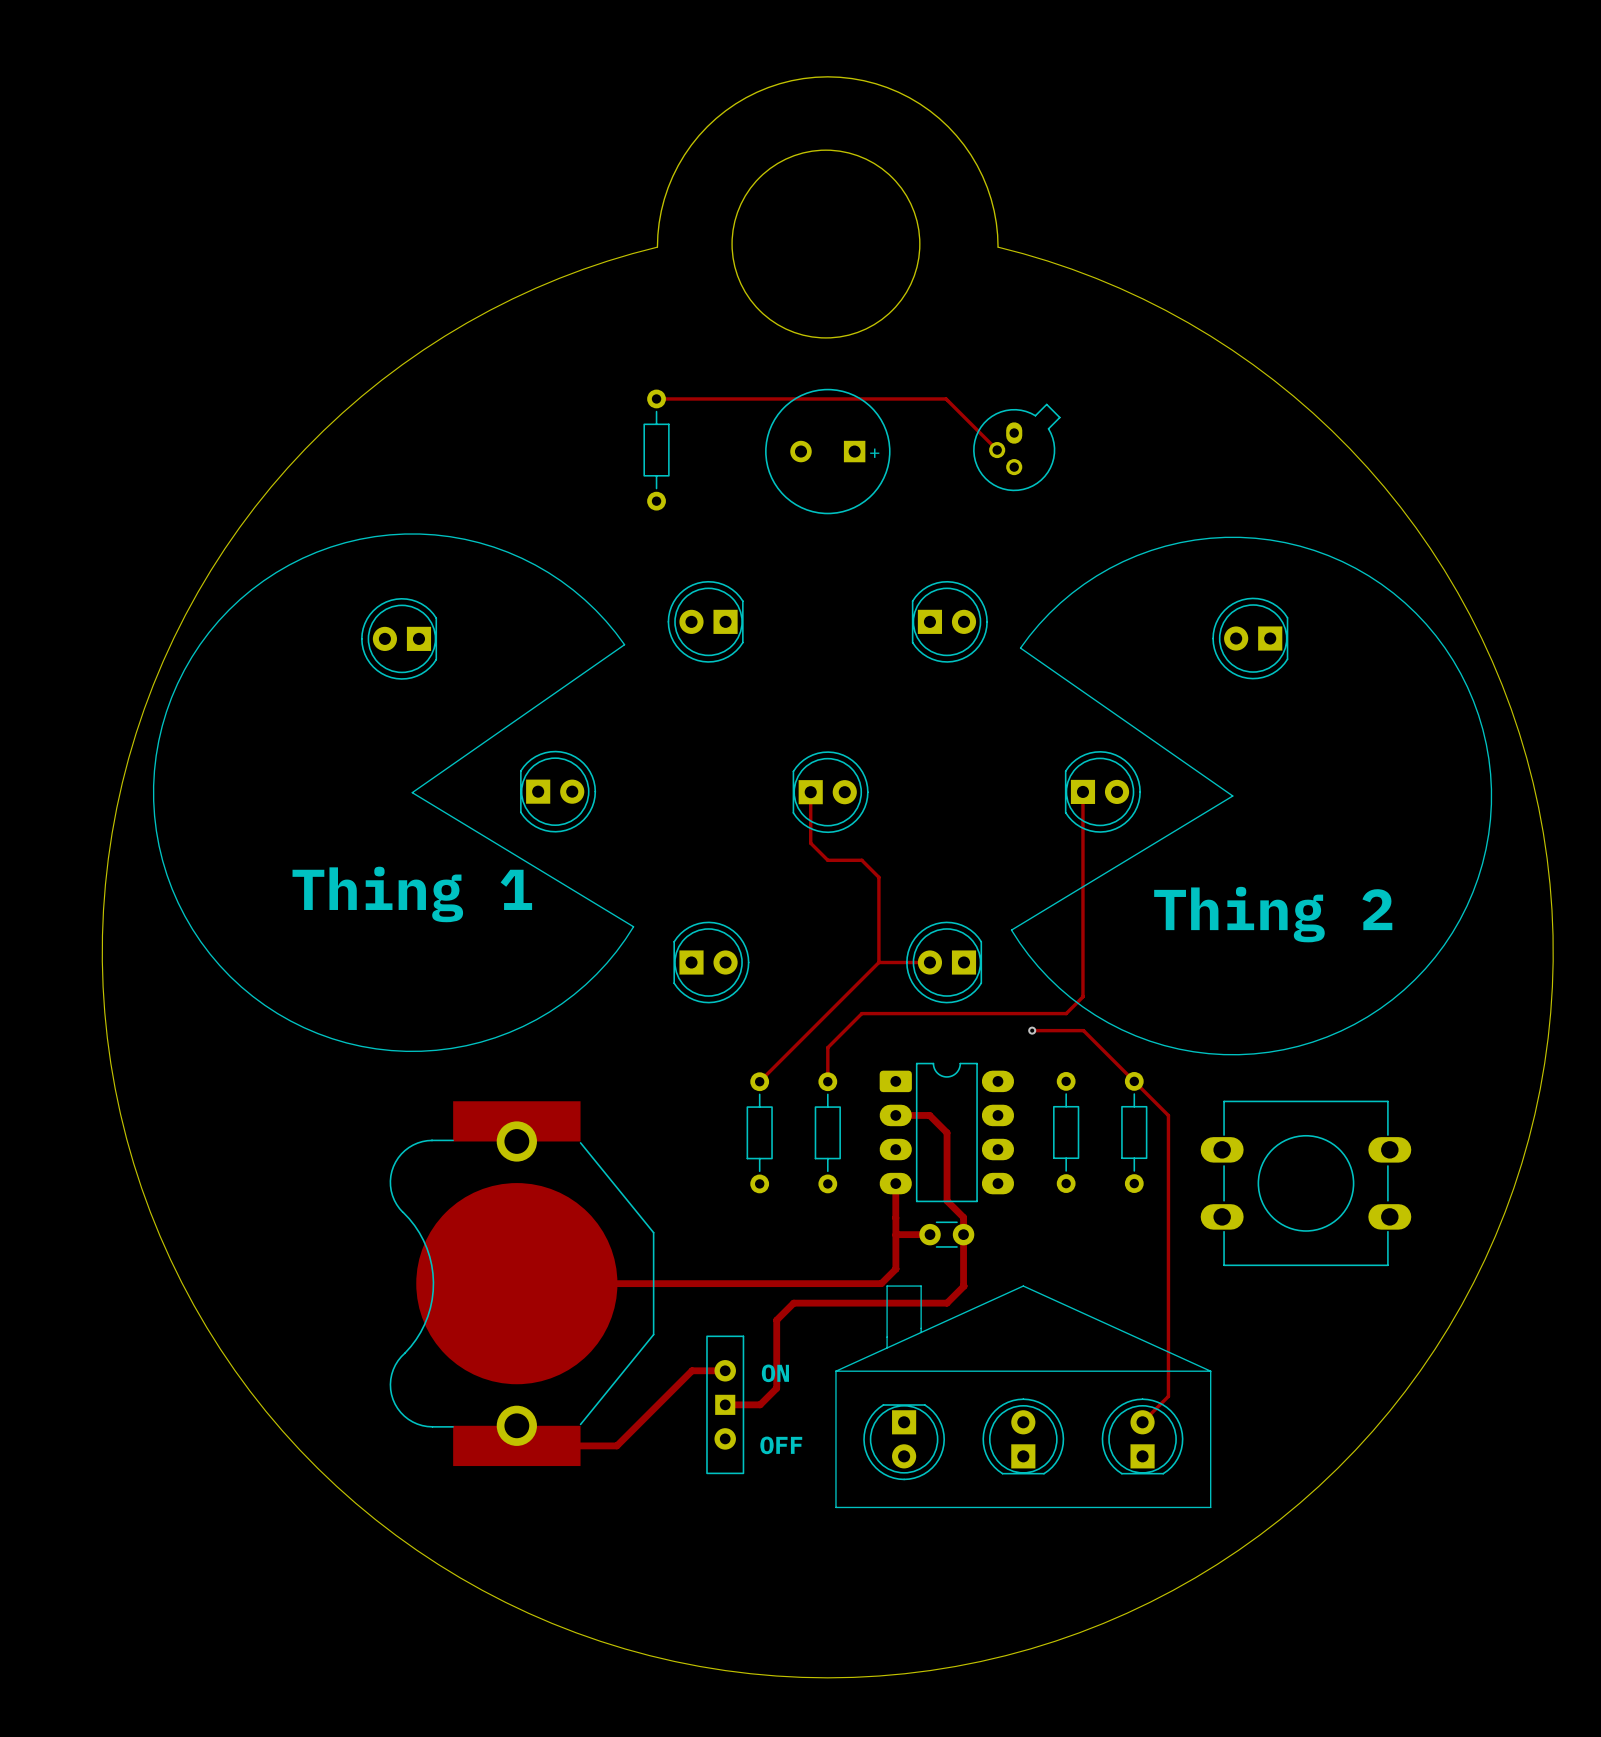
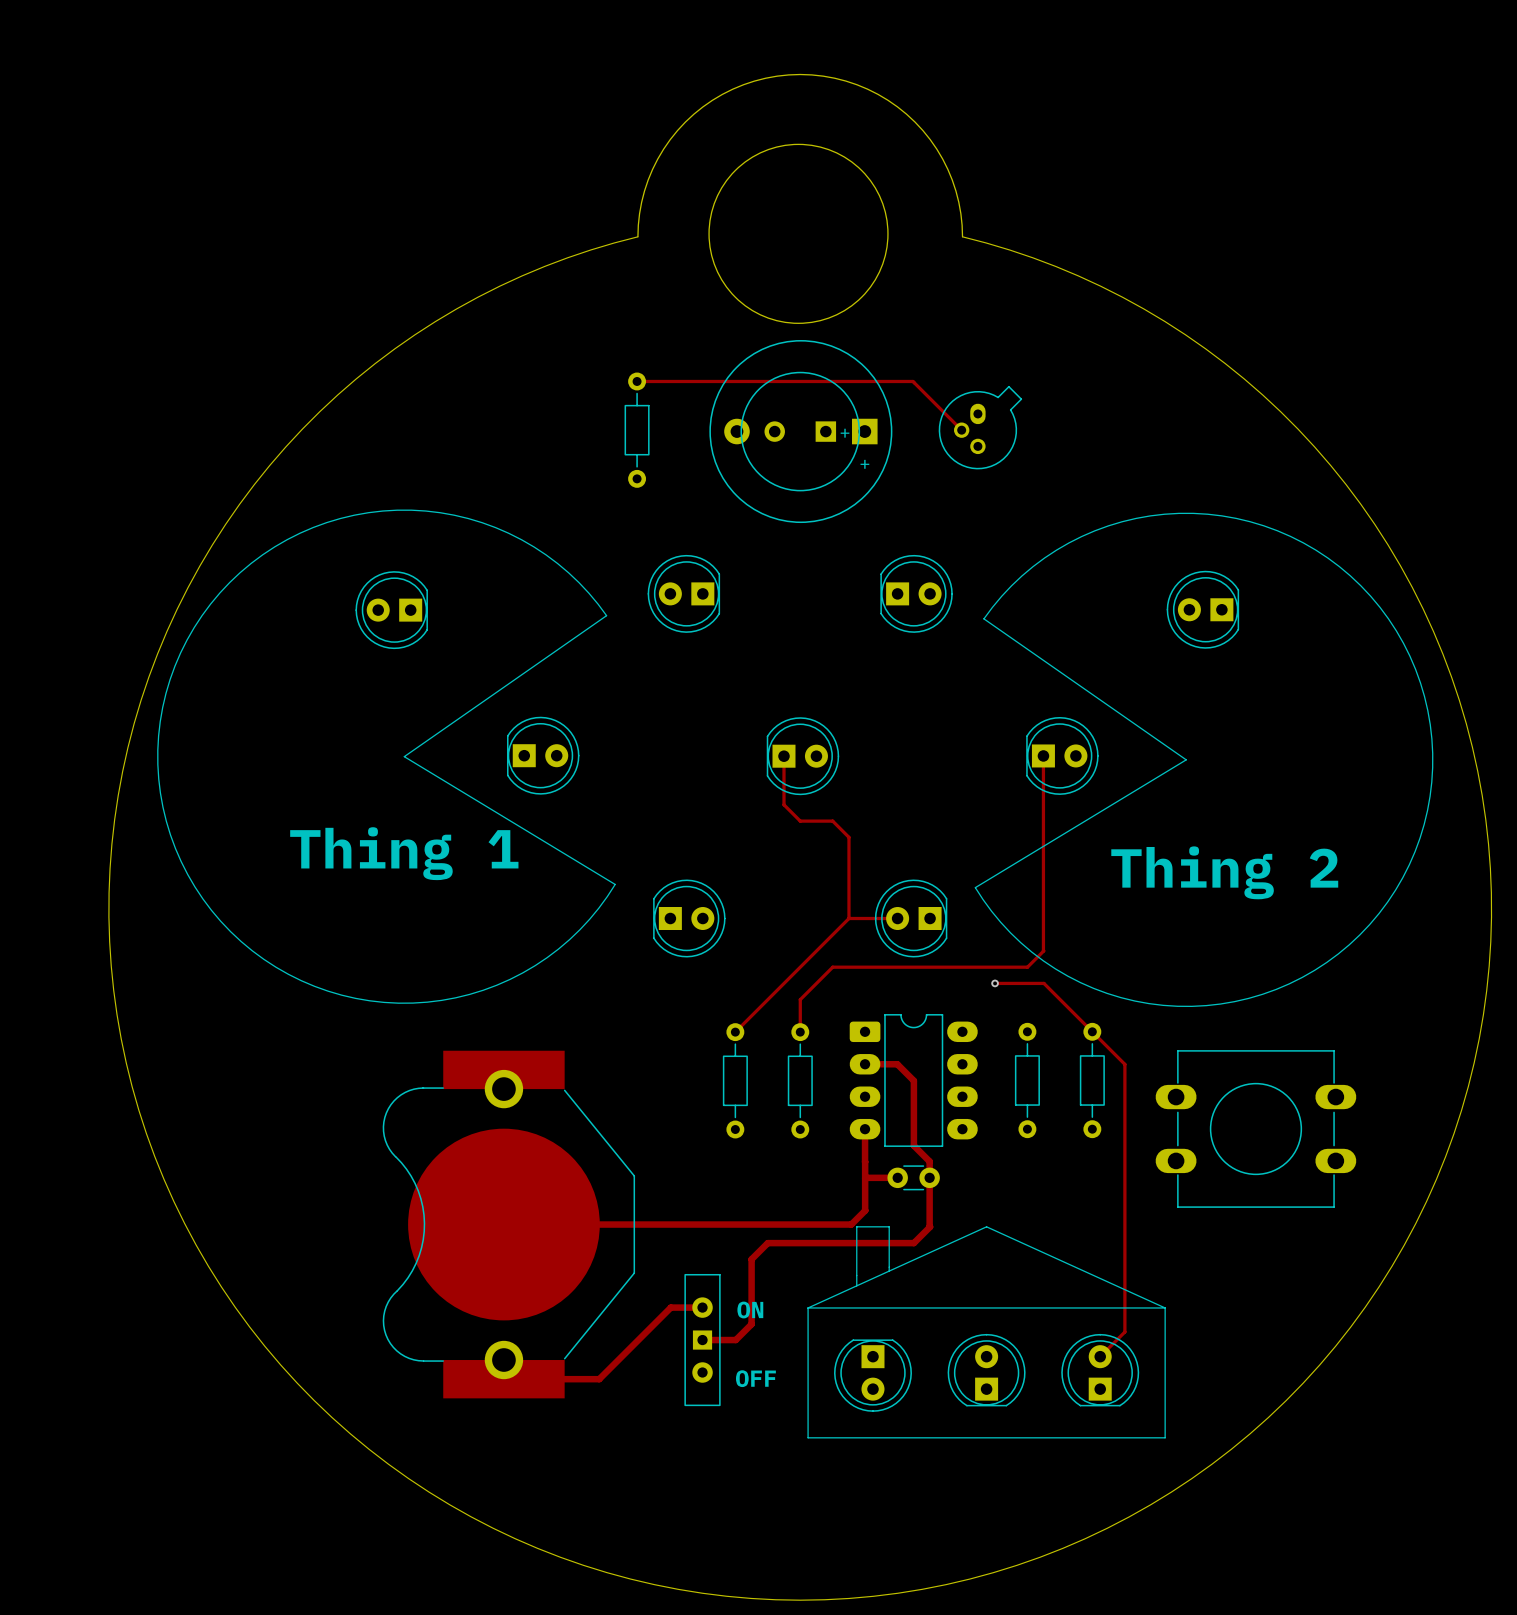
part: none -> (800, 431)

